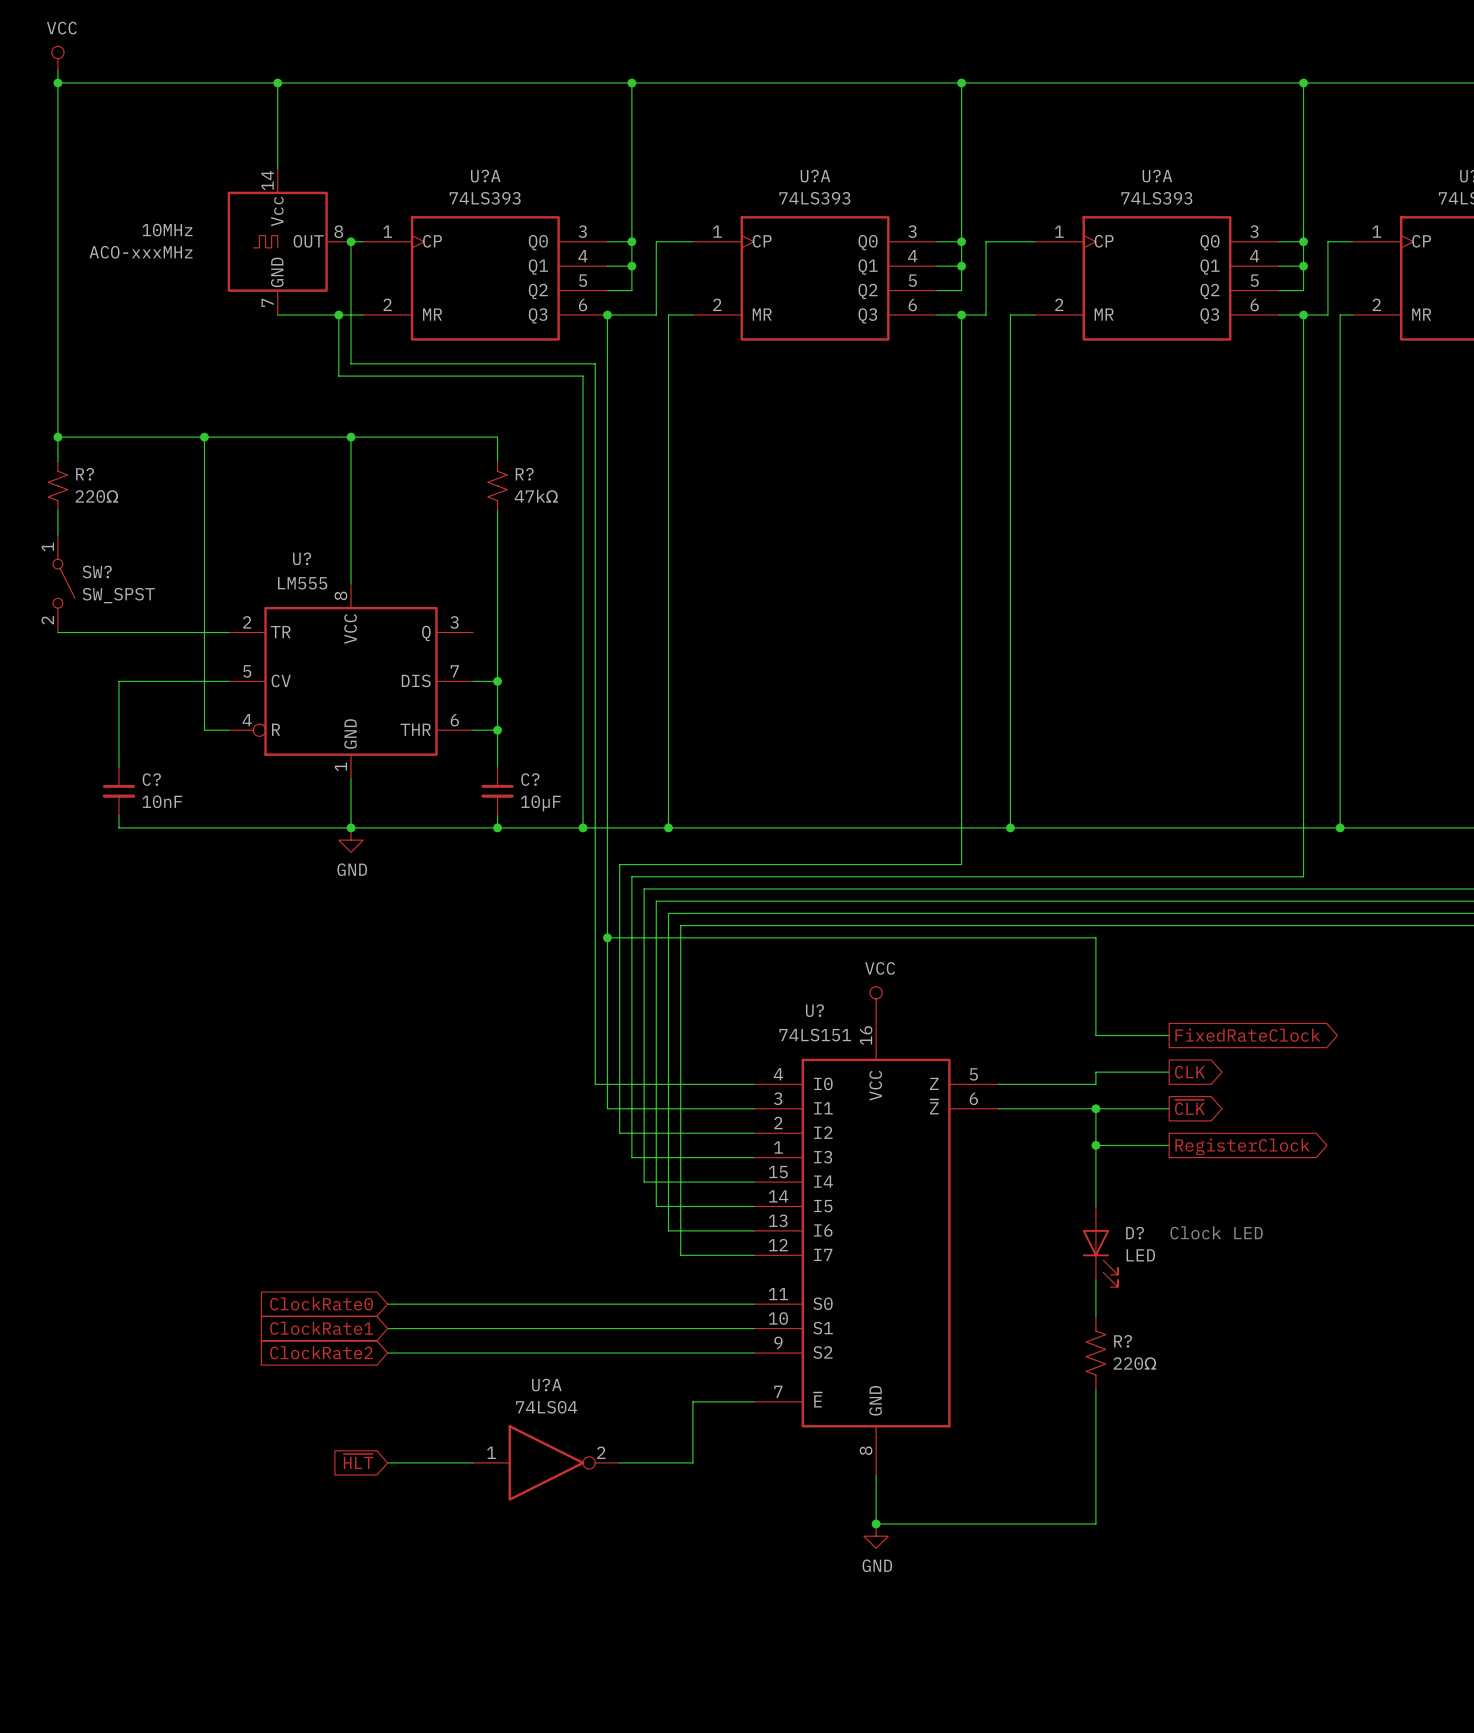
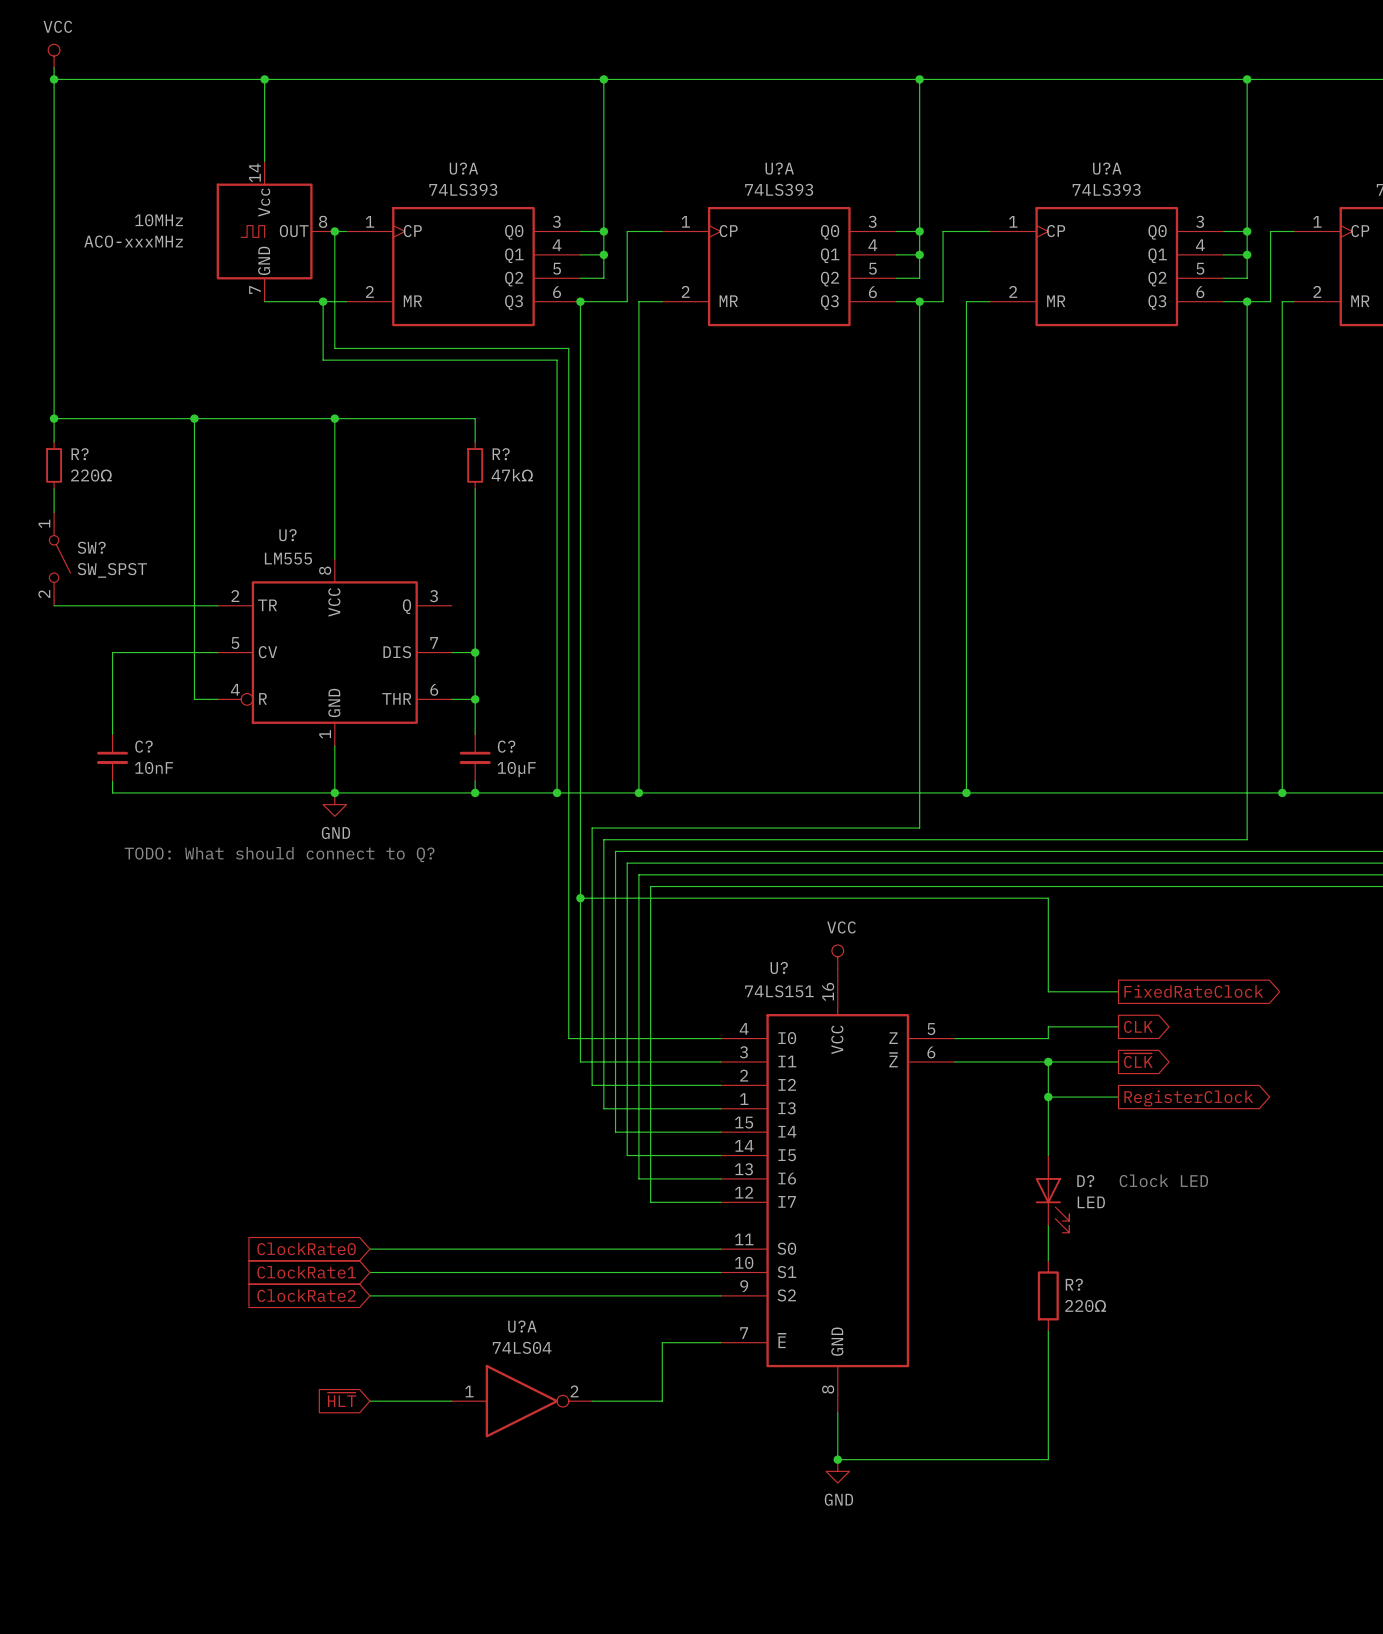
R? symbol: [48, 461, 68, 511] -> [46, 442, 63, 489]
R? symbol: [487, 461, 508, 511] -> [467, 442, 484, 489]
text: none -> TODO: What should connect to Q? (279, 854)
R? symbol: [1086, 1316, 1106, 1390] -> [1037, 1260, 1059, 1331]

